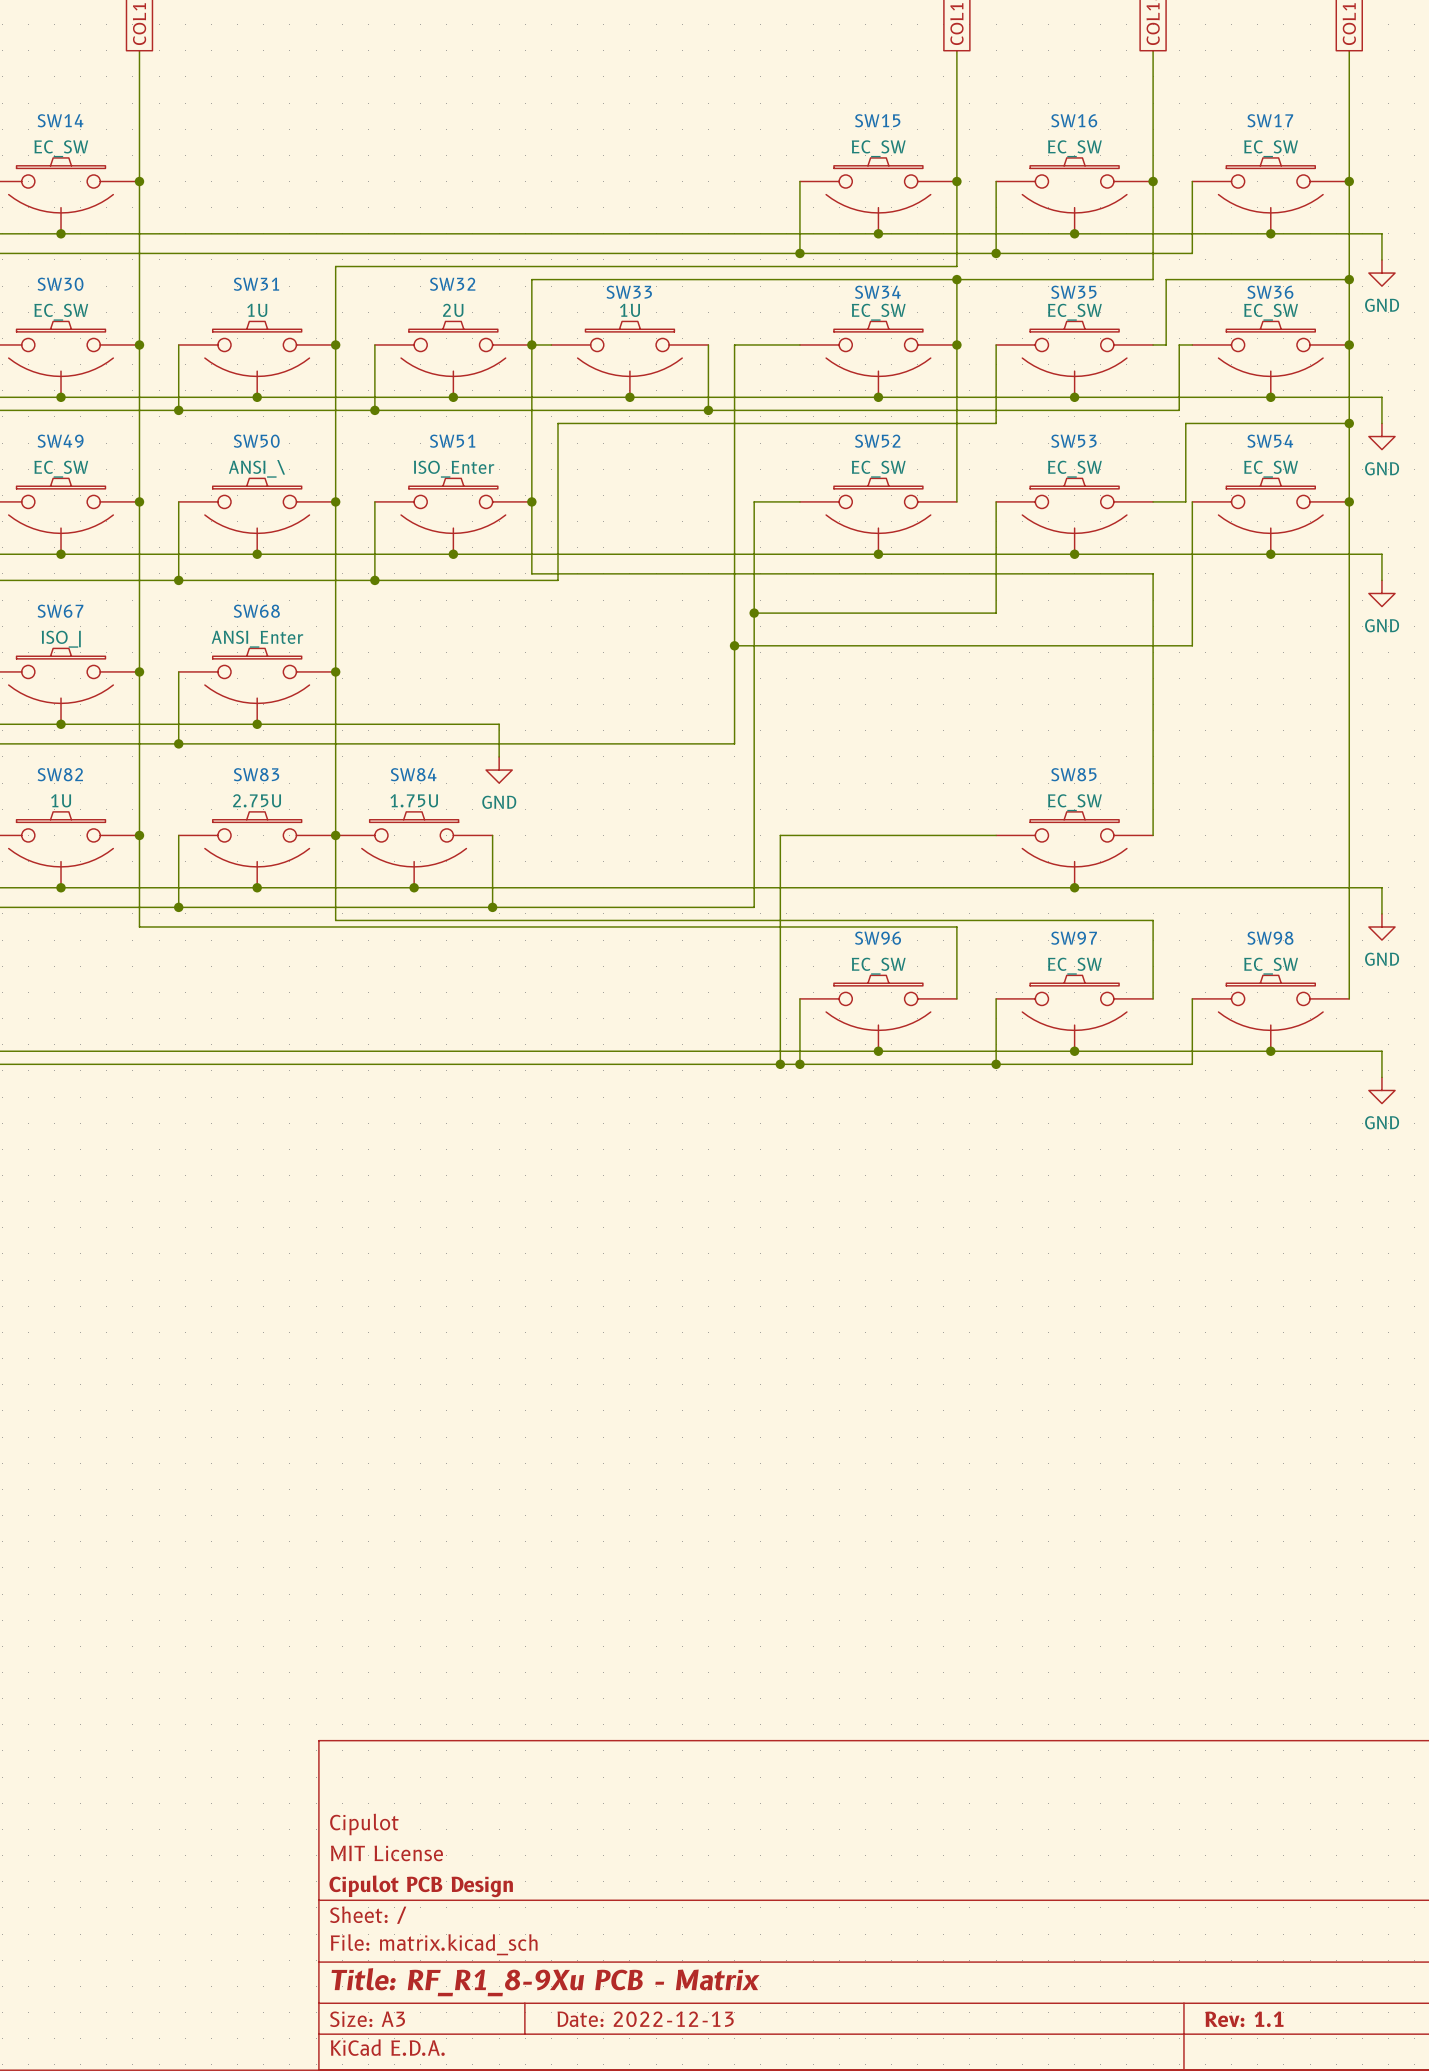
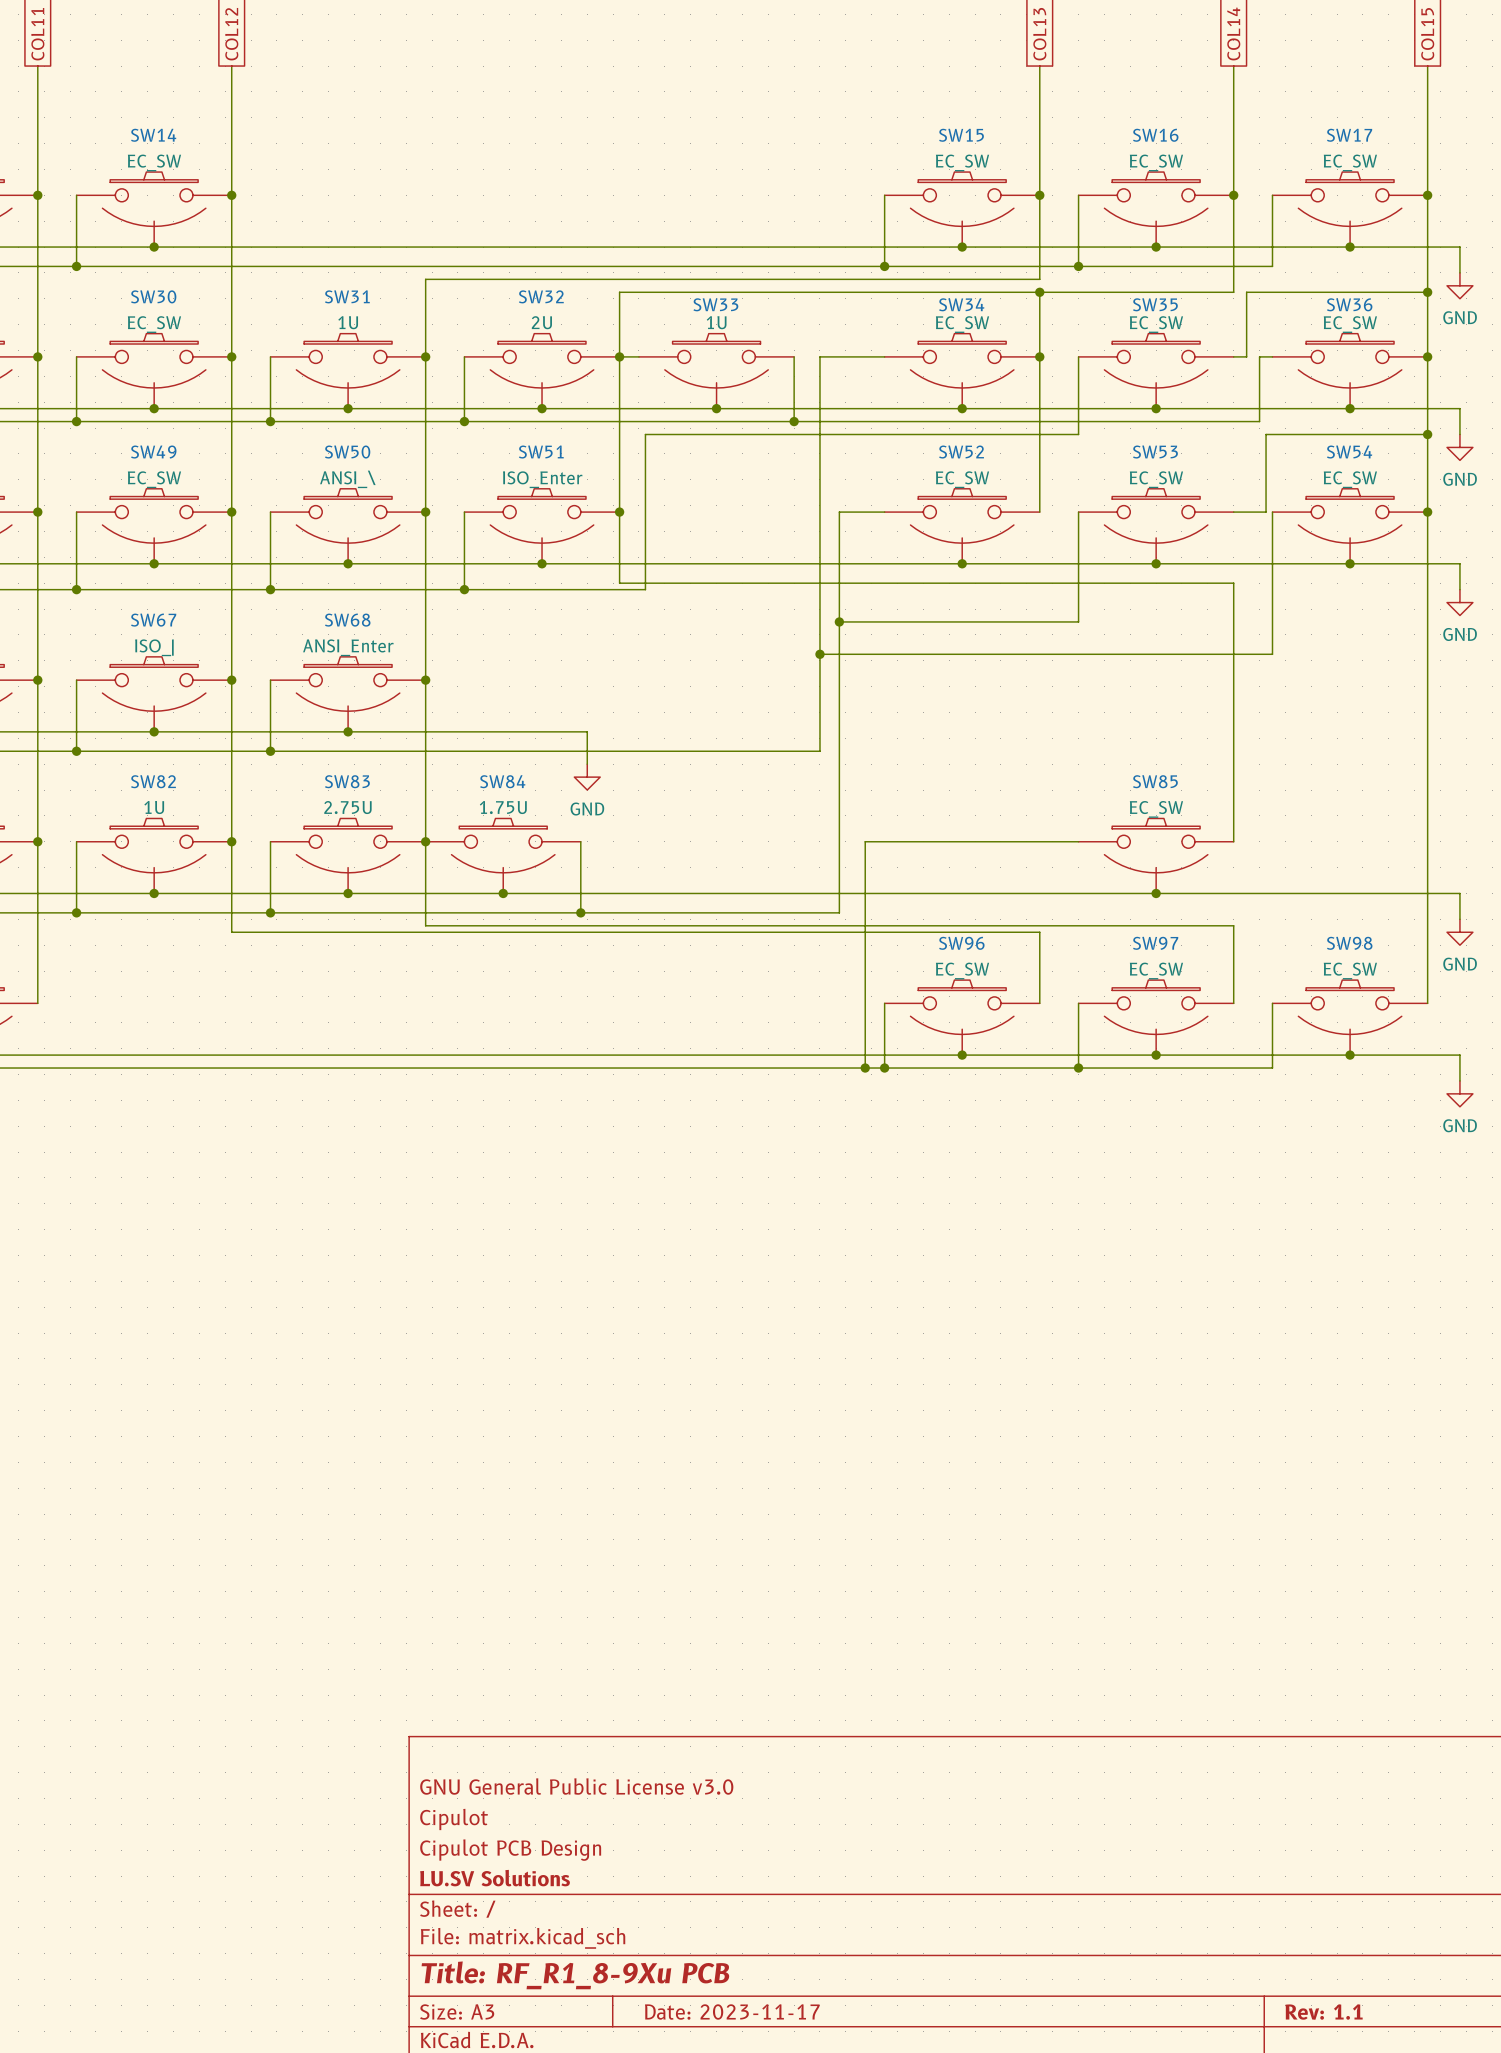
title block: none -> GNU General Public License v3.0 (576, 1786)
title block: MIT License (386, 1853) -> Cipulot PCB Design (510, 1850)
title block: Cipulot PCB Design (421, 1886) -> LU.SV Solutions (495, 1878)
title block: Title: RF_R1_8-9Xu PCB - Matrix (545, 1982) -> Title: RF_R1_8-9Xu PCB (575, 1975)
title block: Date: 2022-12-13 (645, 2019) -> Date: 2023-11-17 (732, 2011)

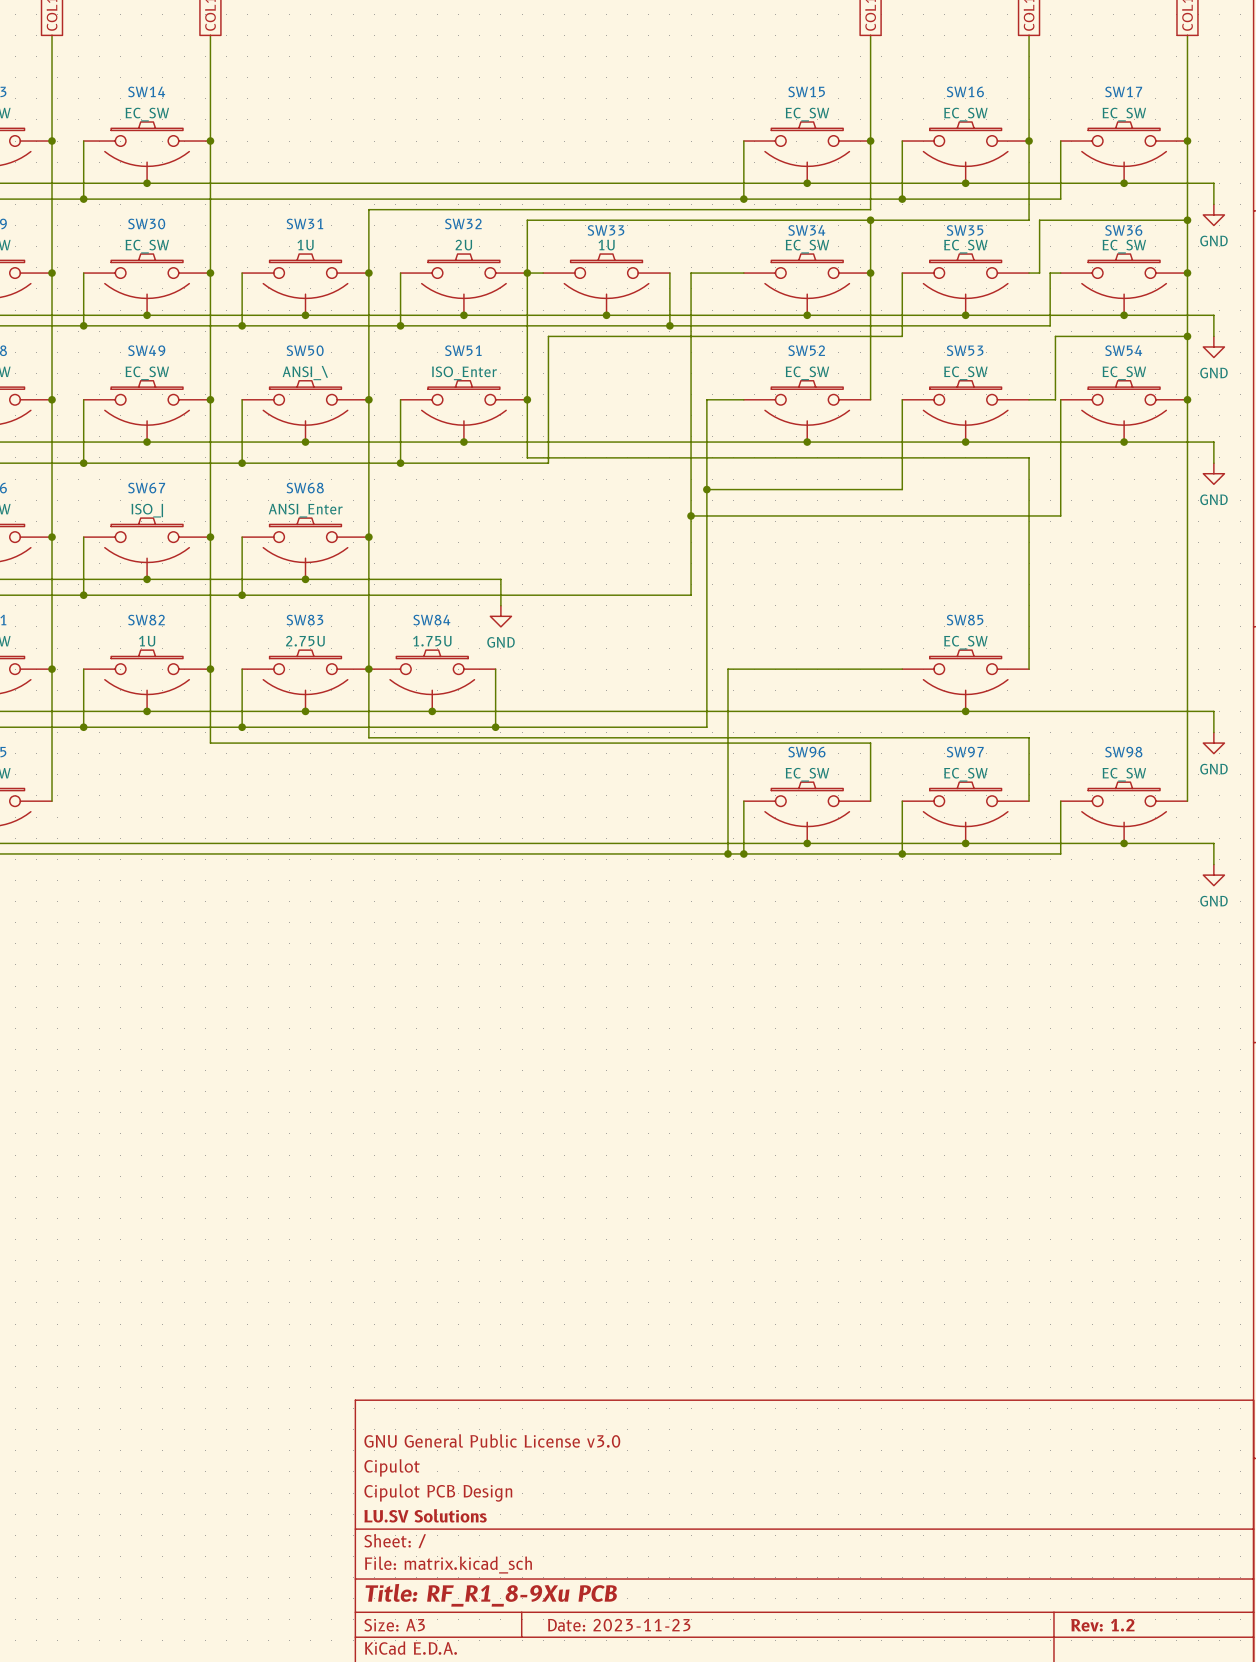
title block: Date: 2023-11-17 (732, 2011) -> Date: 2023-11-23 (619, 1625)
title block: Rev: 1.1 (1324, 2012) -> Rev: 1.2 (1102, 1625)

